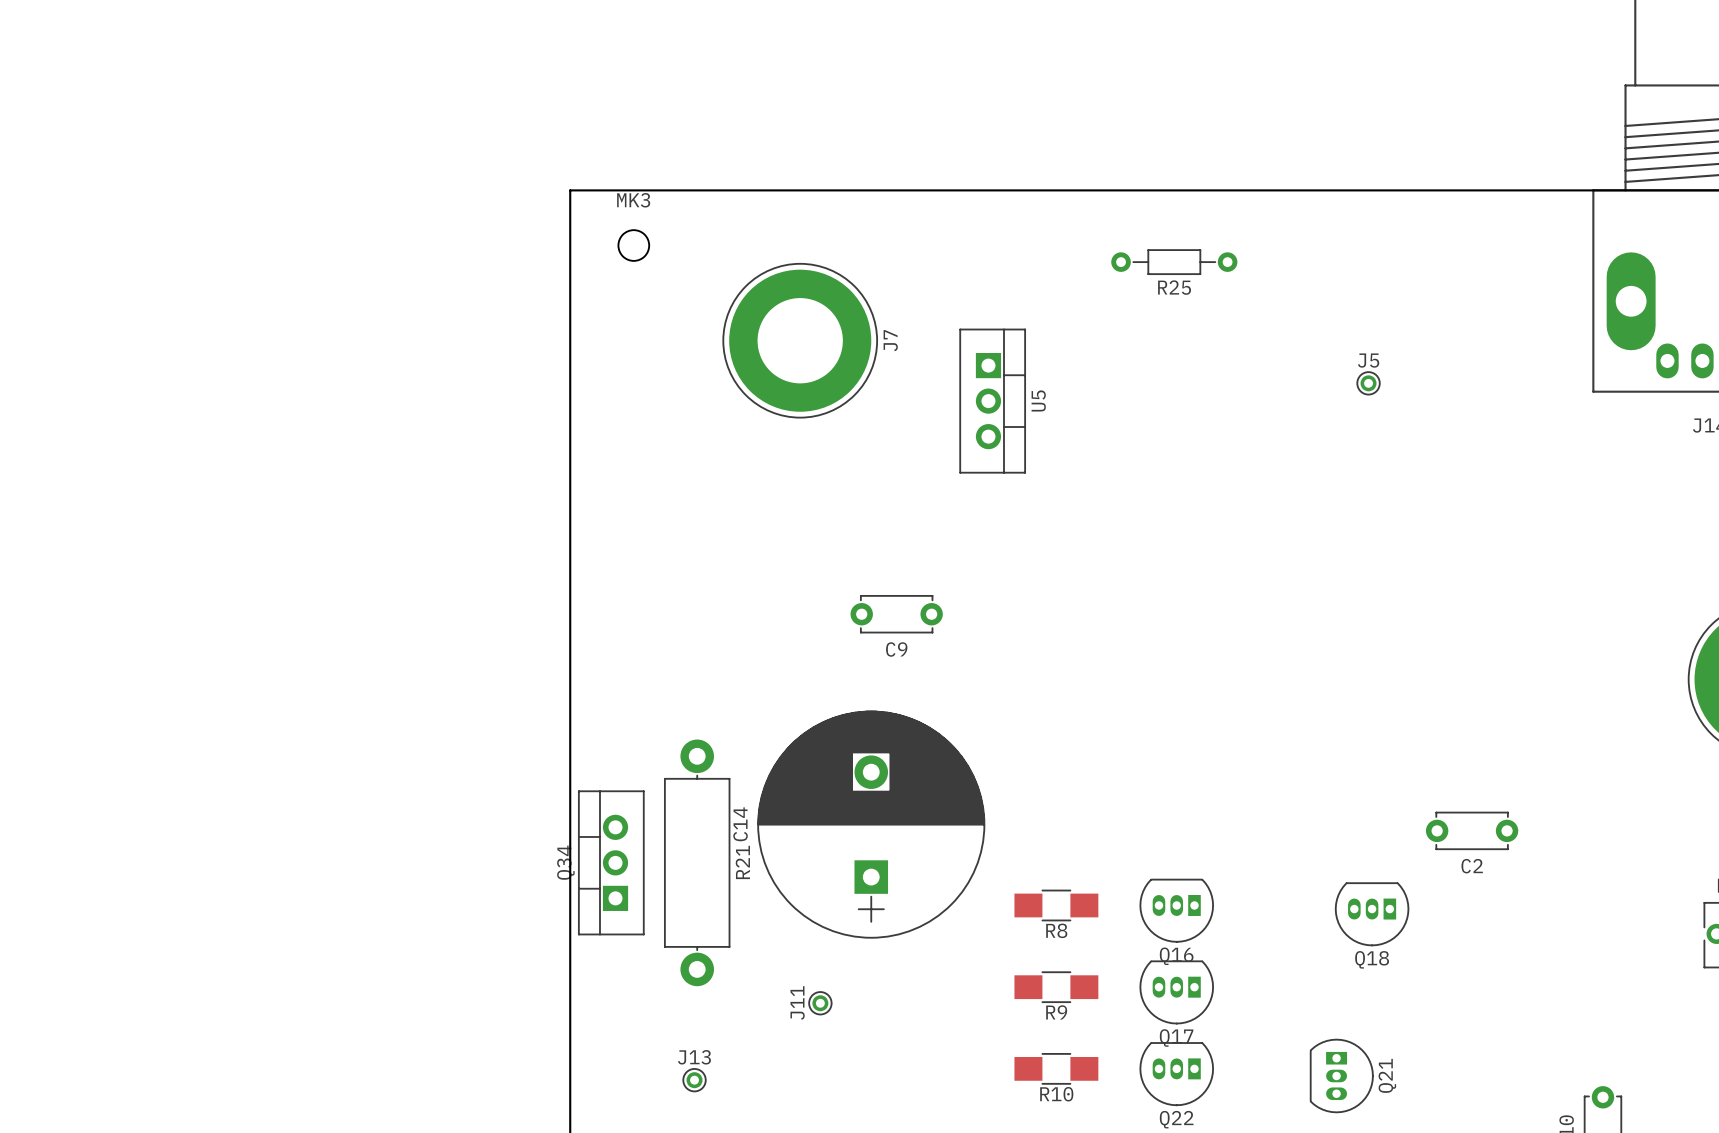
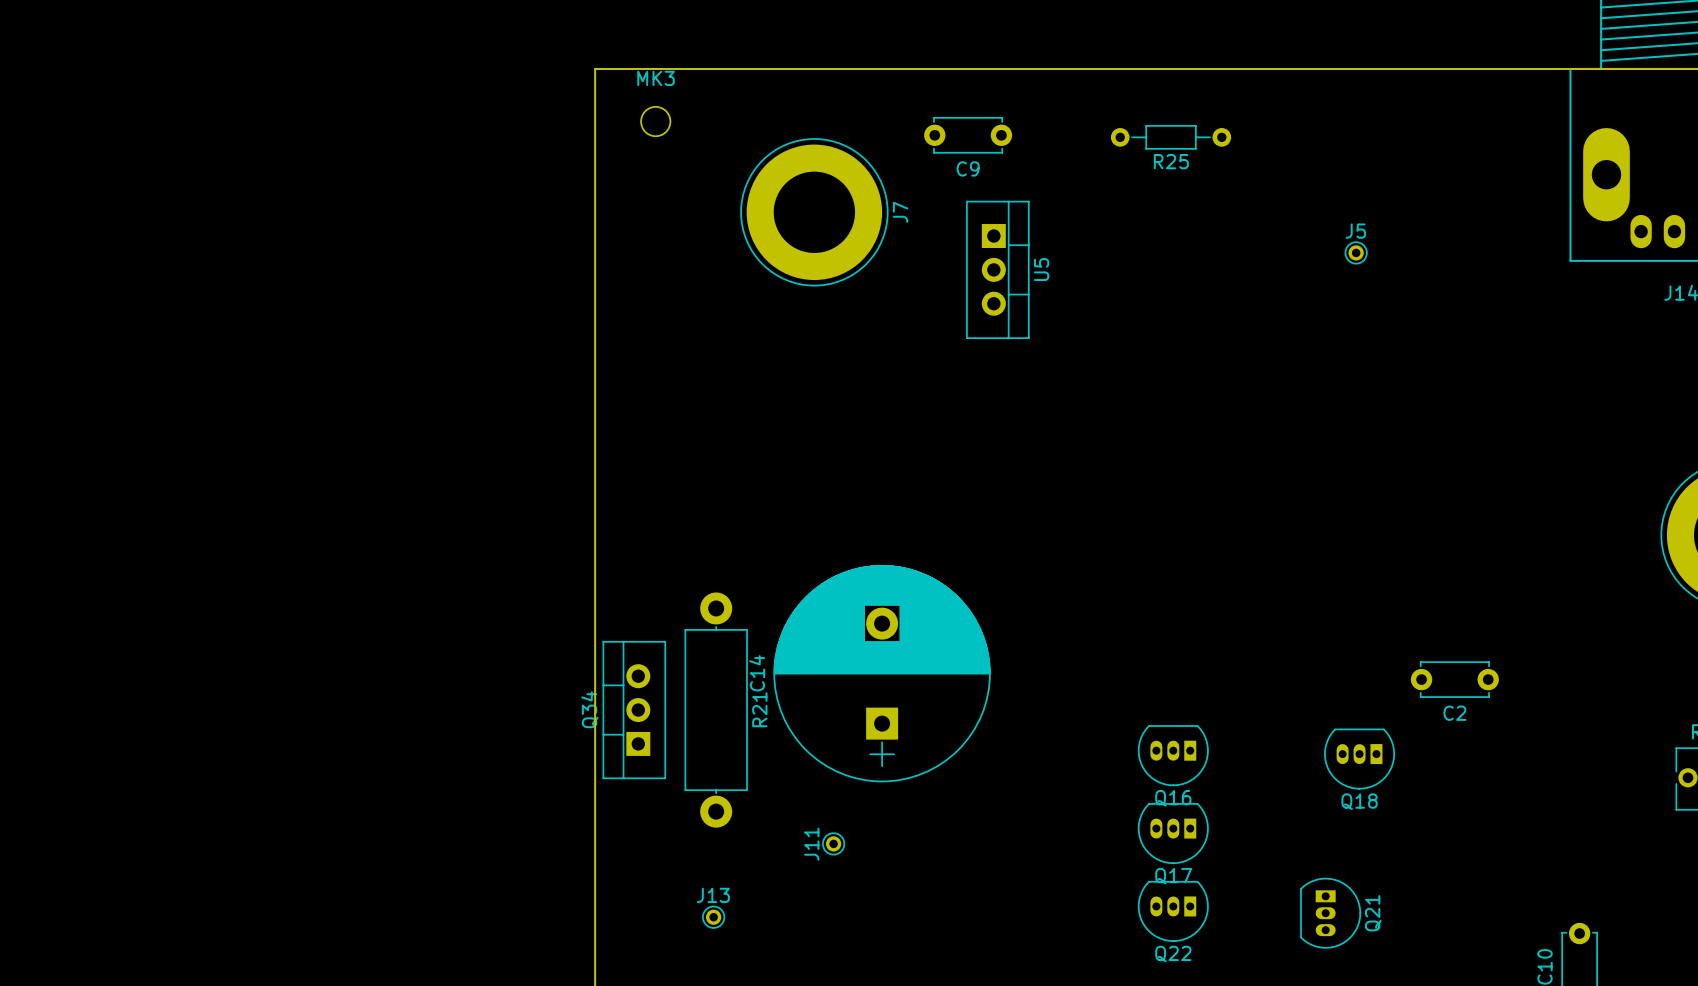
C9 position: (896, 614) -> (968, 135)
R8: (1056, 905) -> none
R9: (1056, 987) -> none
R10: (1056, 1068) -> none

